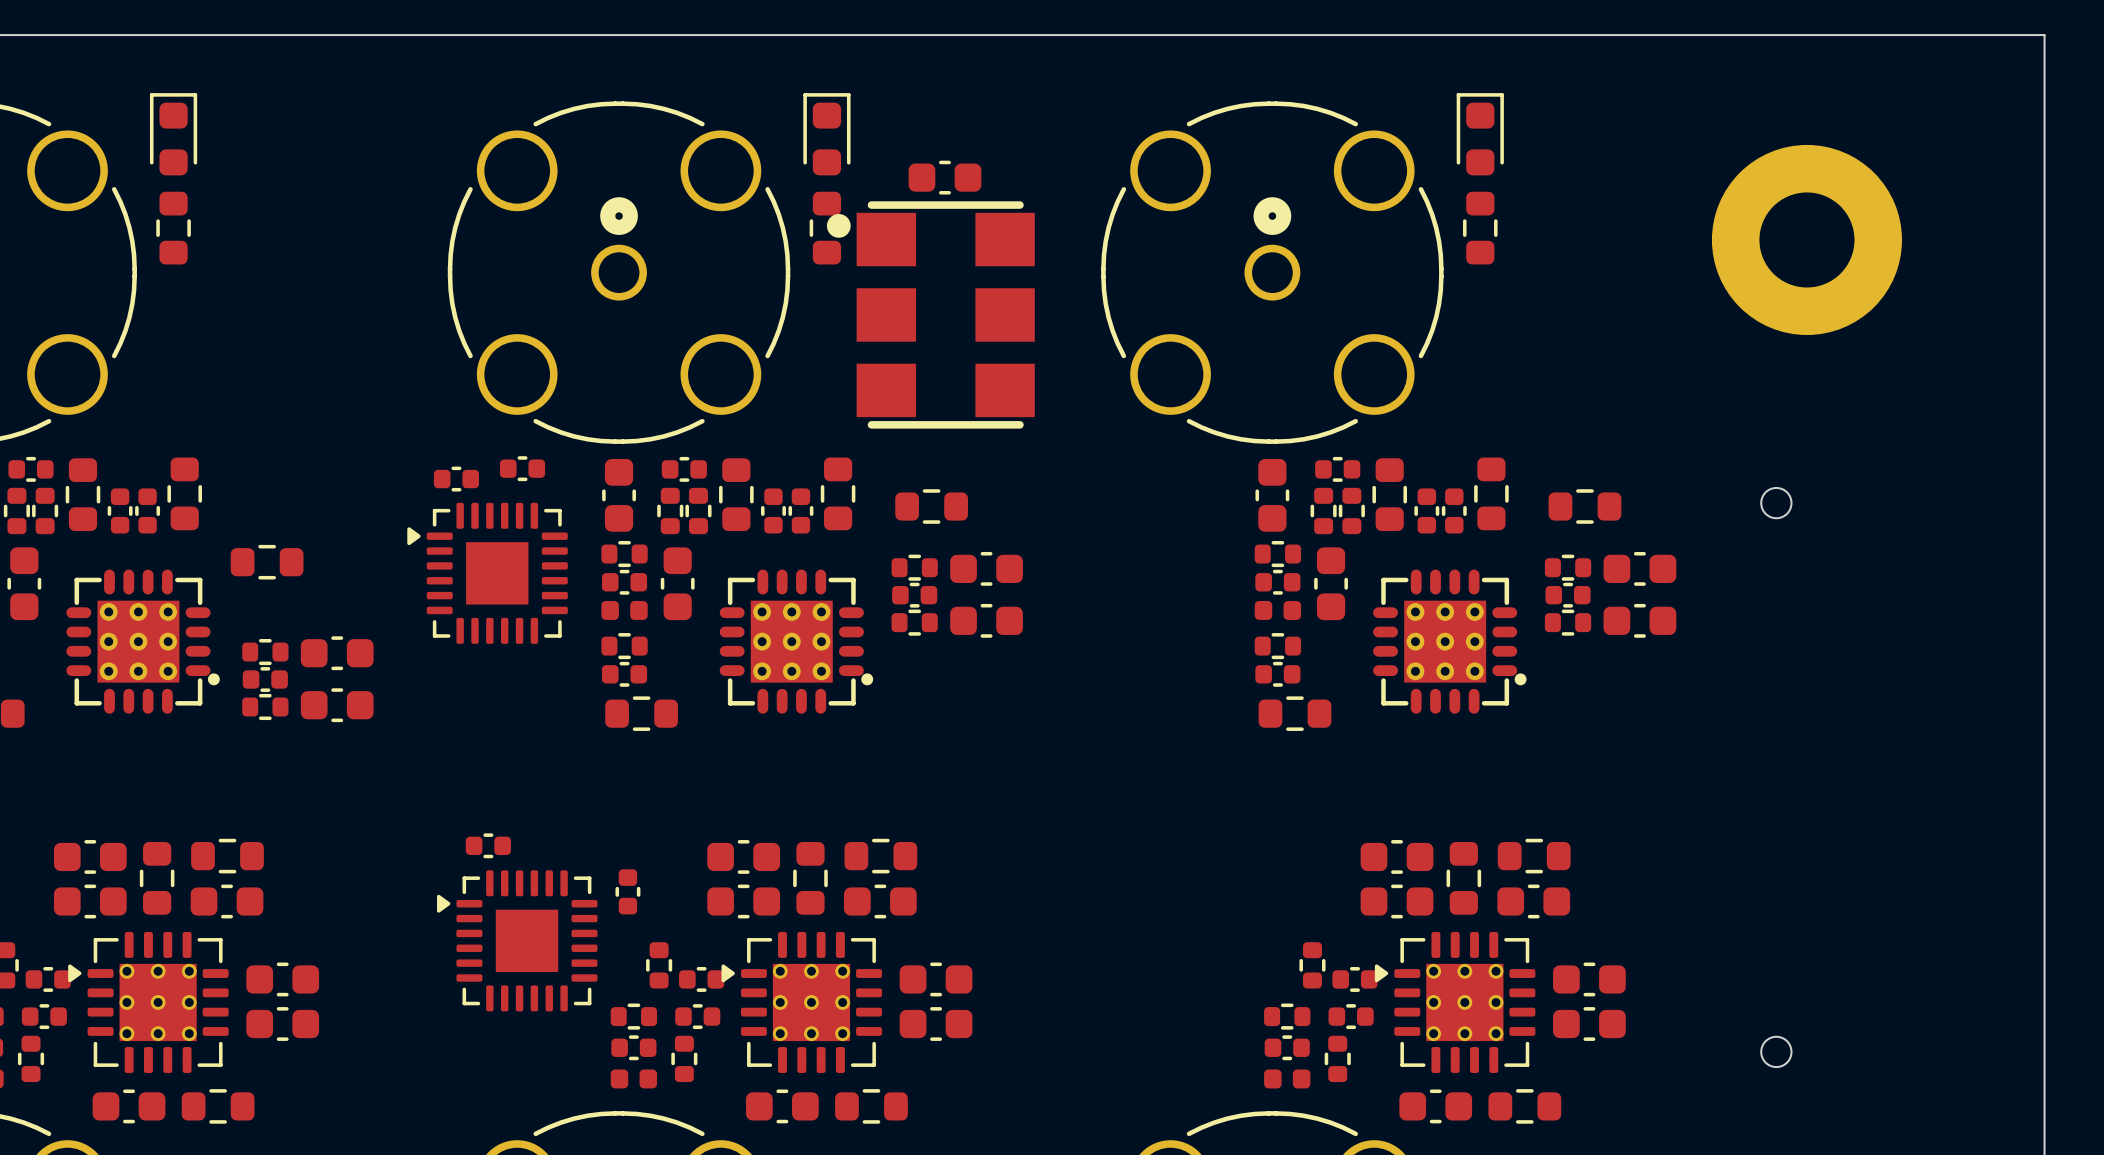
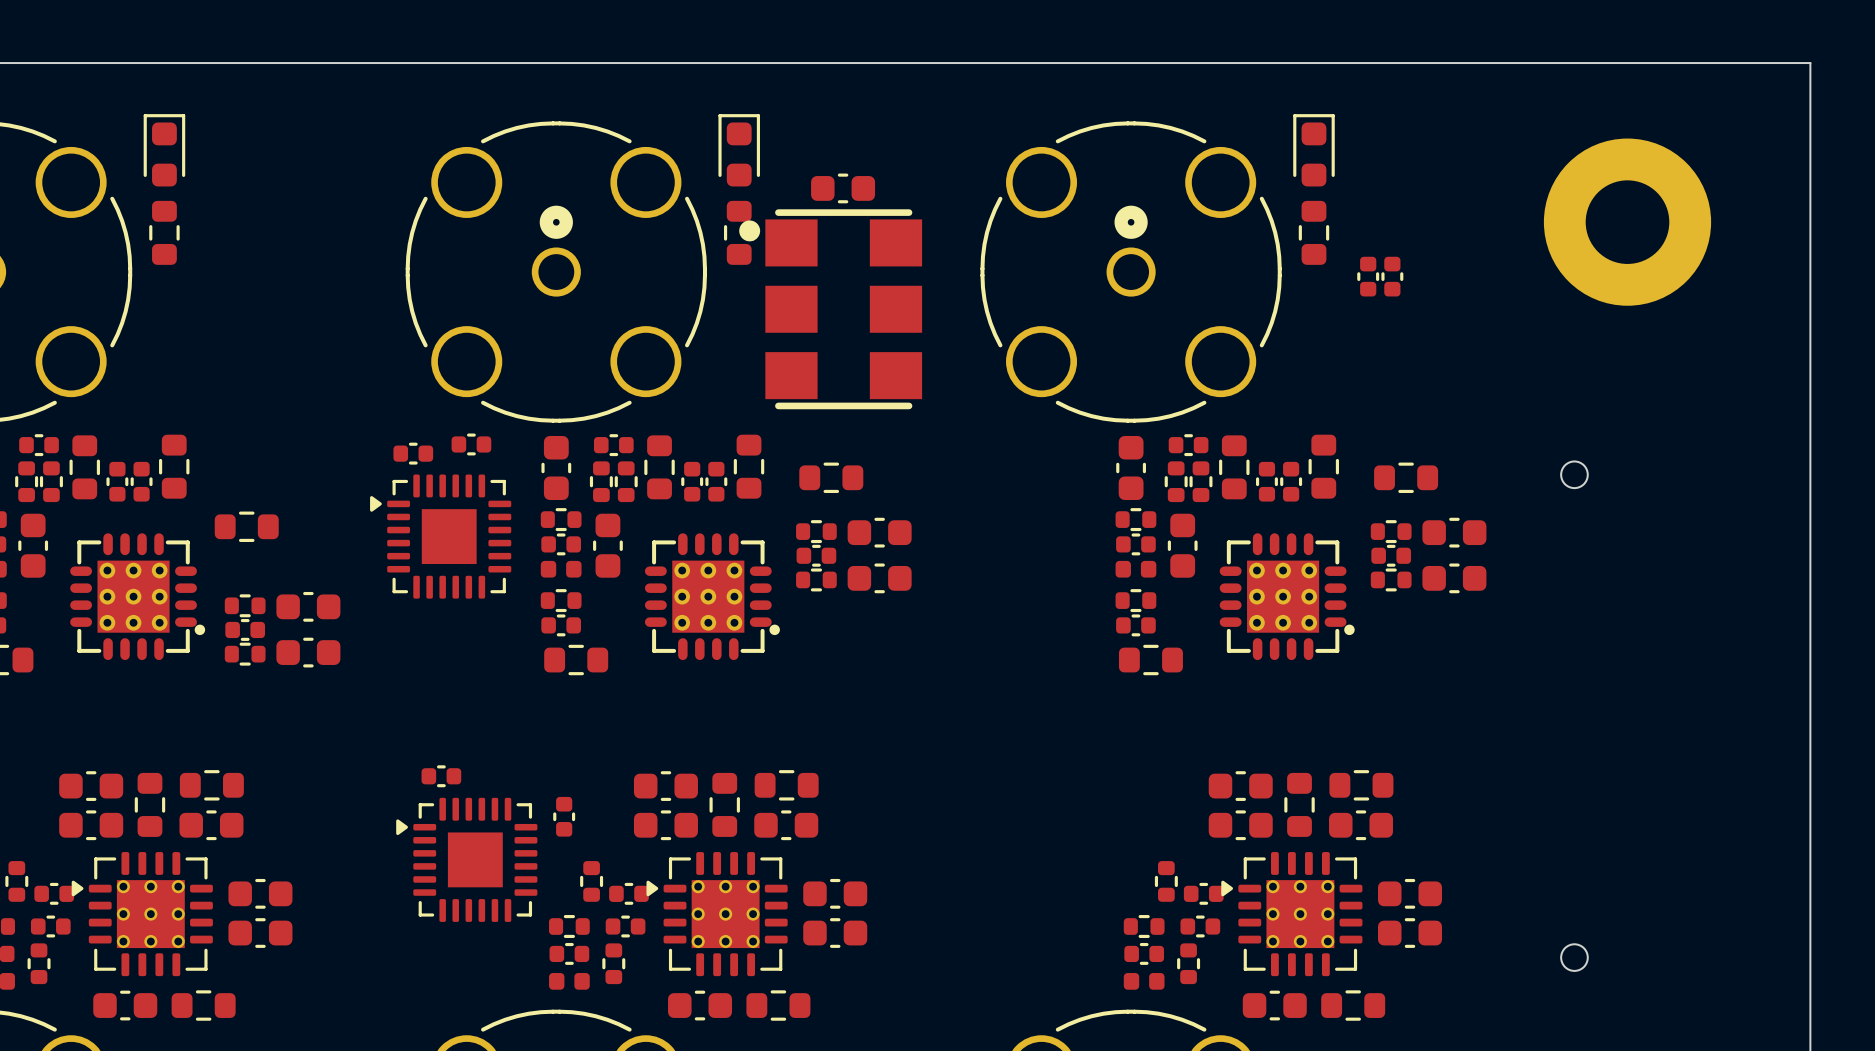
part position: (1806, 239) -> (1627, 222)
part: none -> (1368, 276)
part: none -> (1392, 276)

